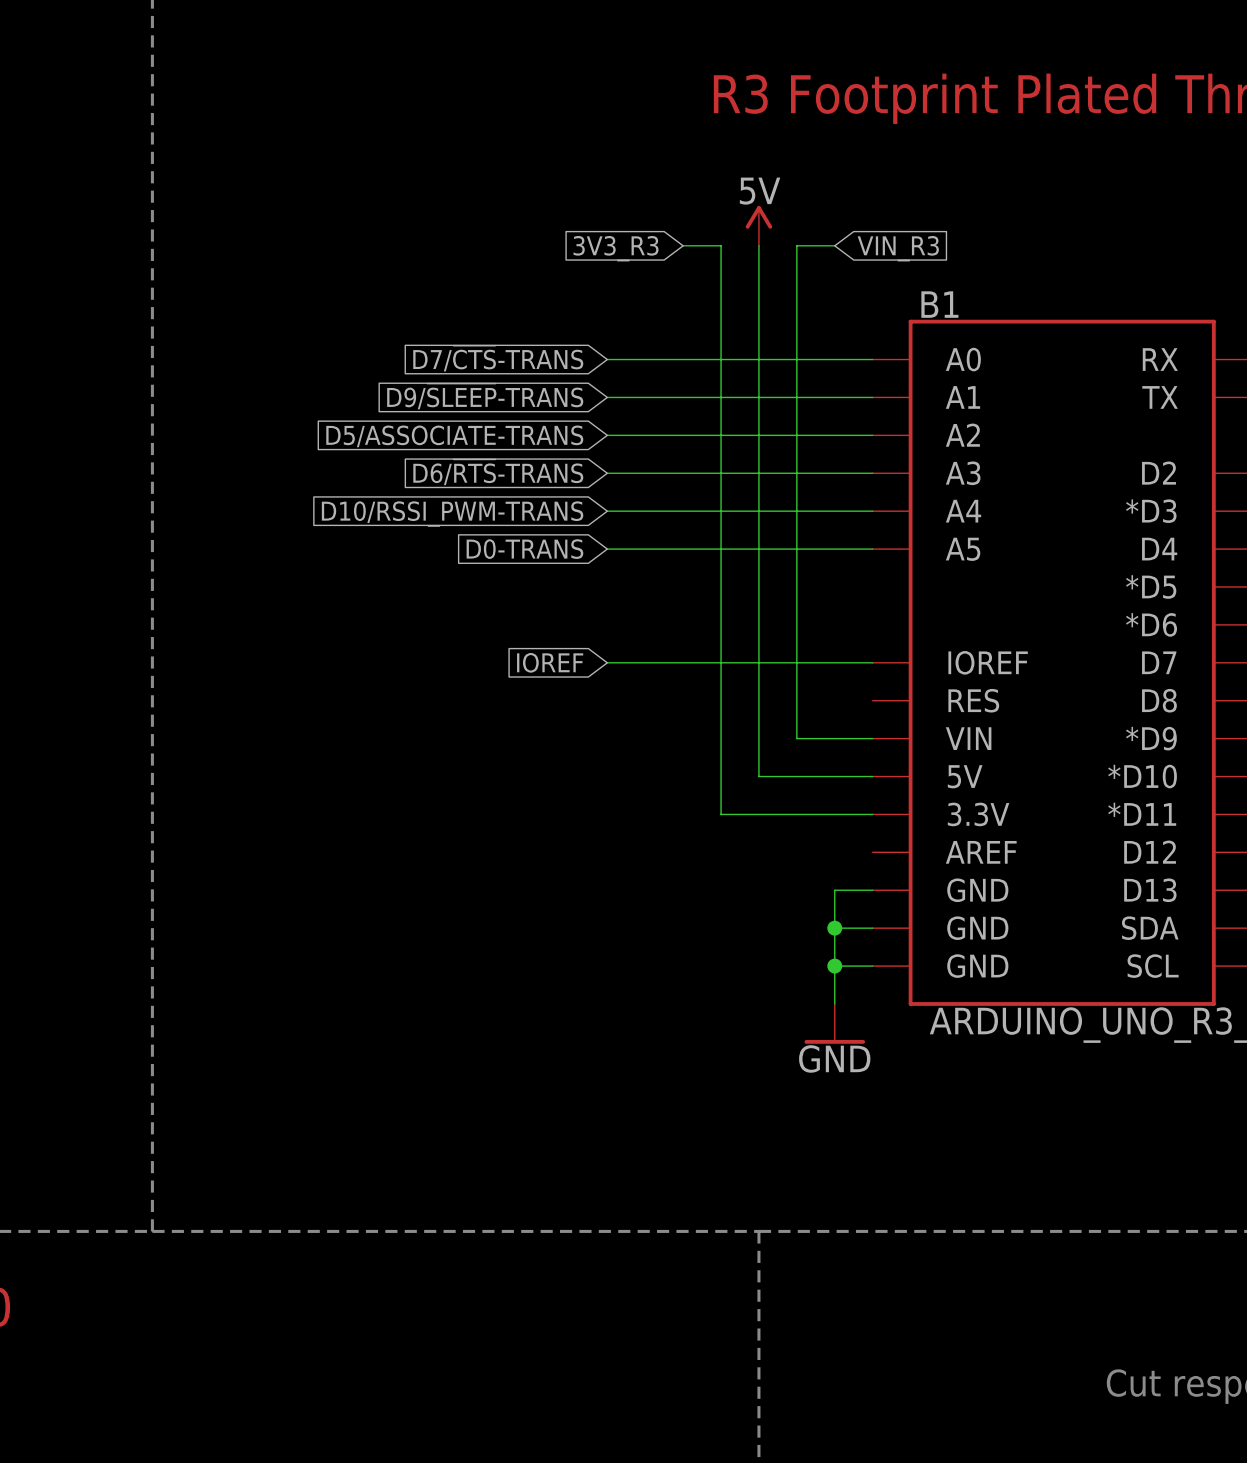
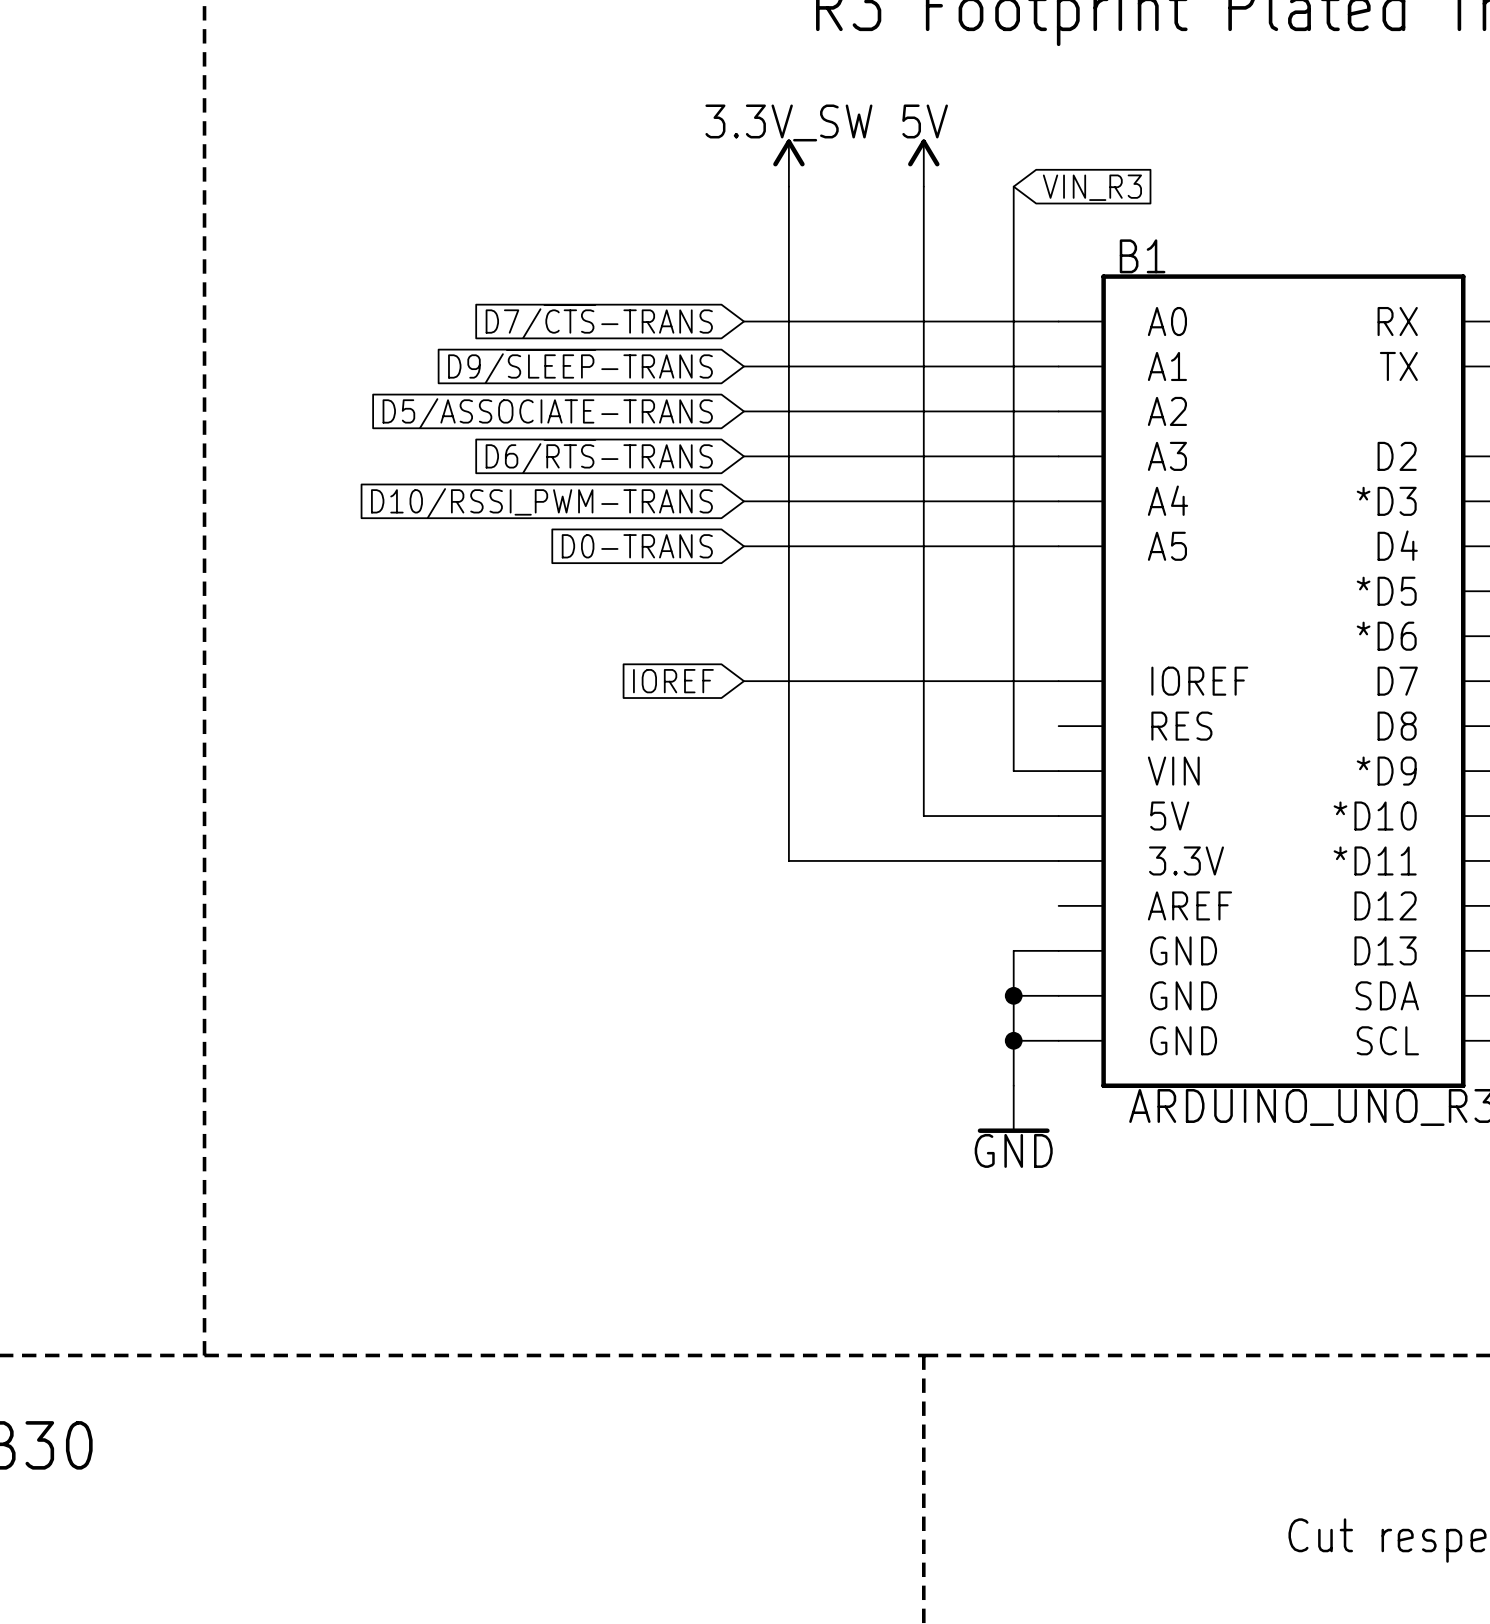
power symbol: none -> 3.3V_SW (788, 163)
wire: (683, 245) (721, 245) (721, 814) -> (788, 186) (788, 860) (878, 860)
wire: (834, 245) (796, 245) (796, 738) (834, 738) -> (1013, 186) (1013, 771)
global label: 3V3_R3 (616, 248) -> none

